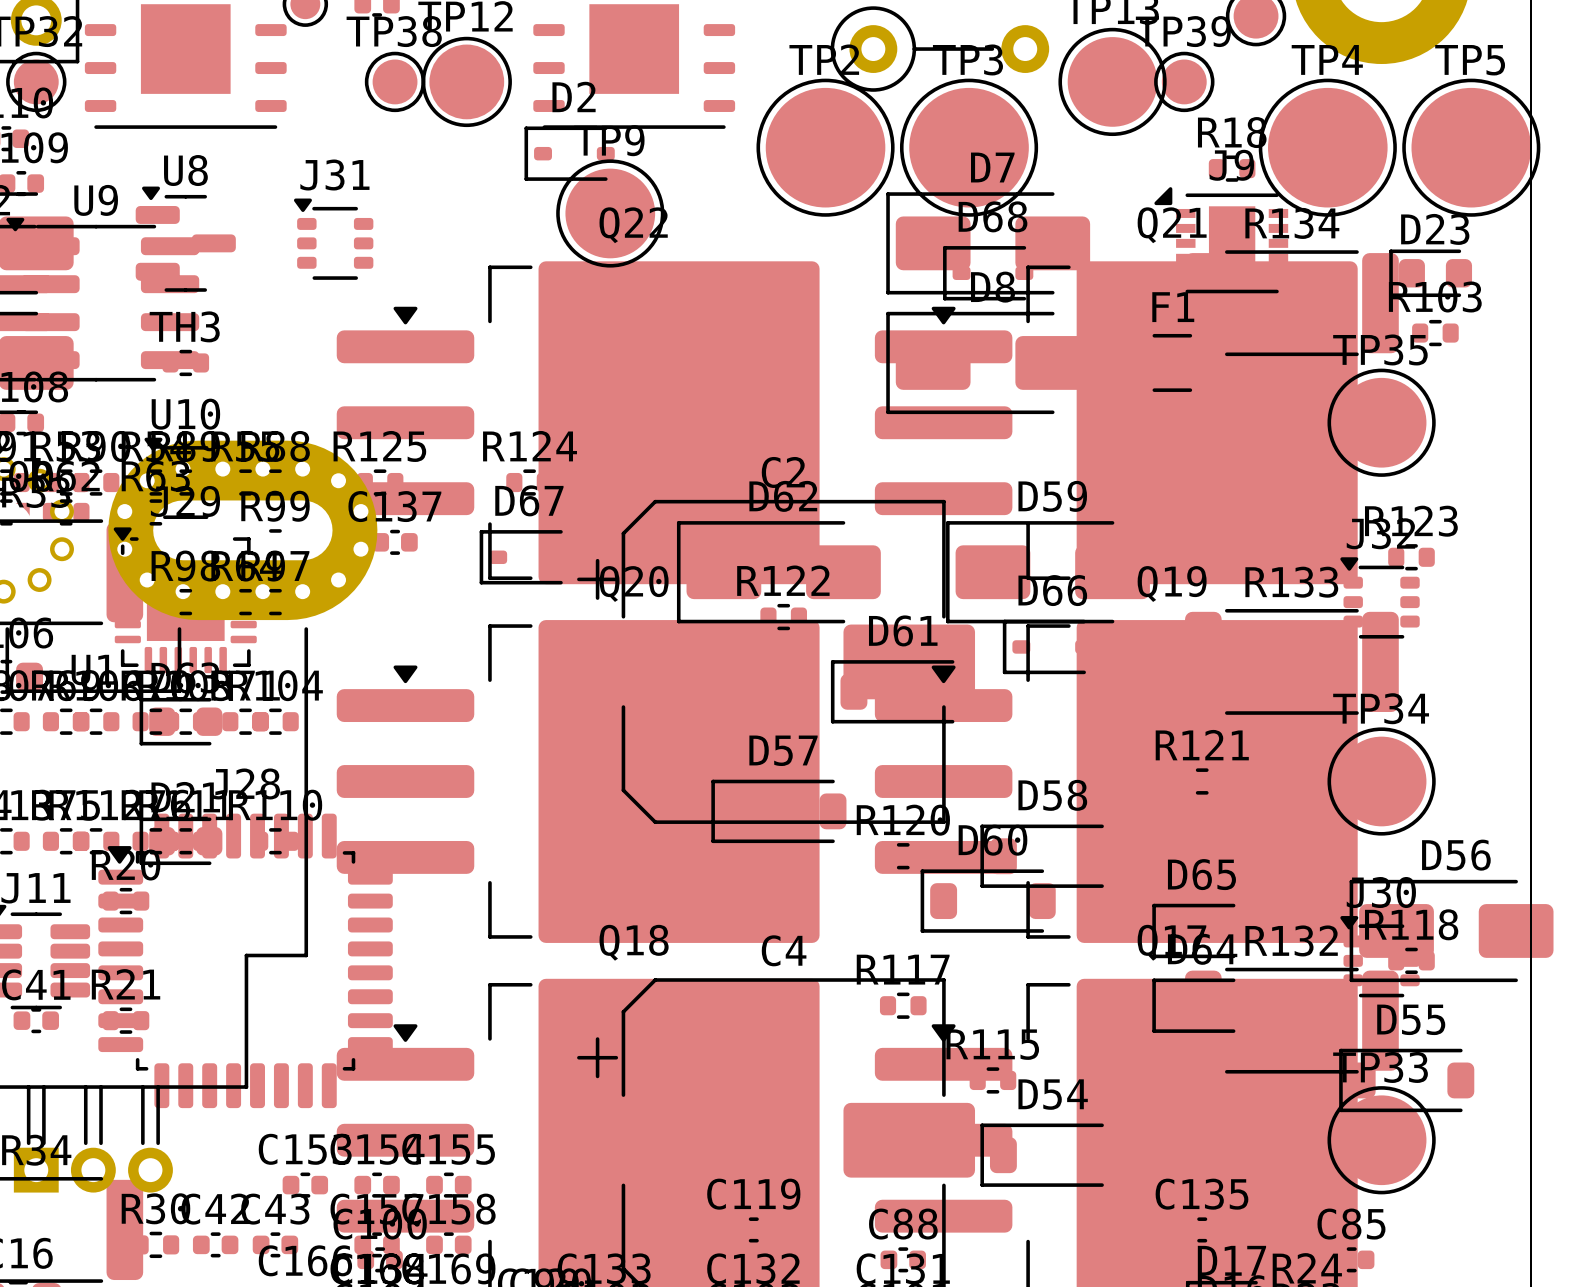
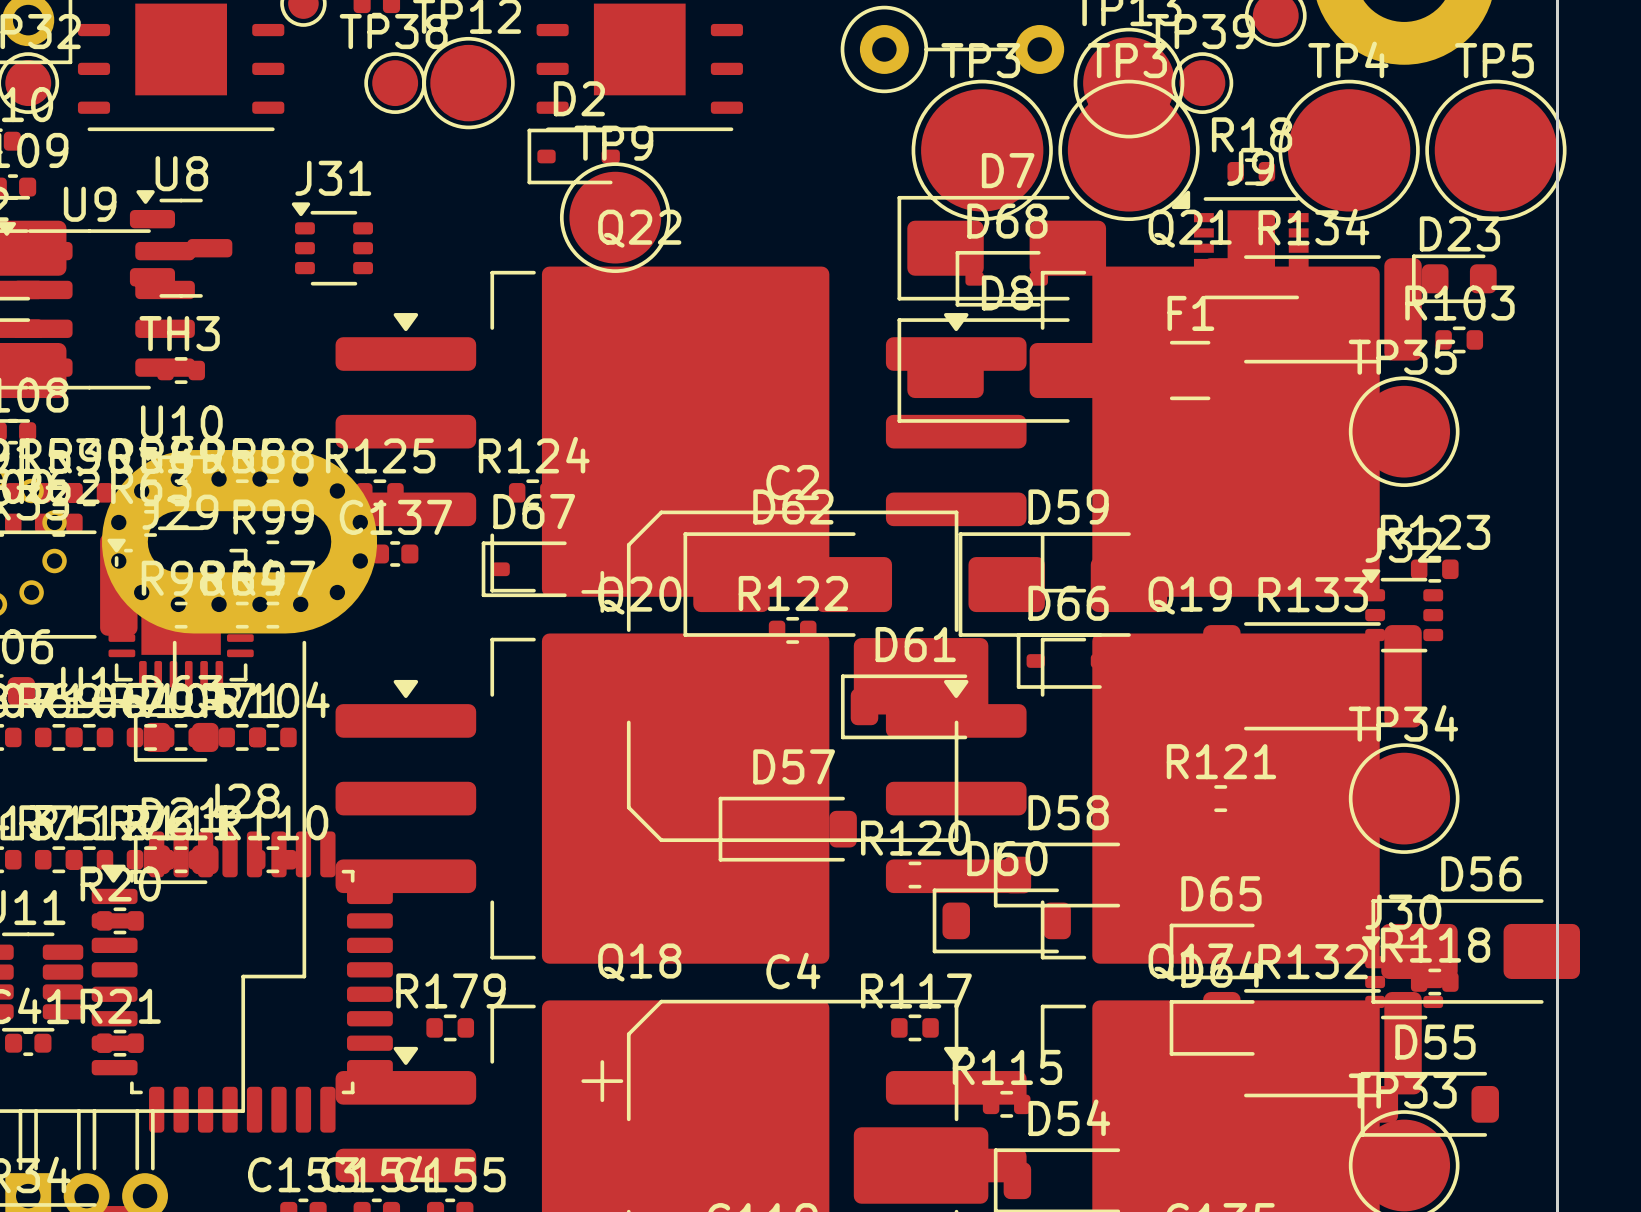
TP2: (825, 147) -> none
TP3: none -> (1128, 150)
R179: none -> (450, 1027)

